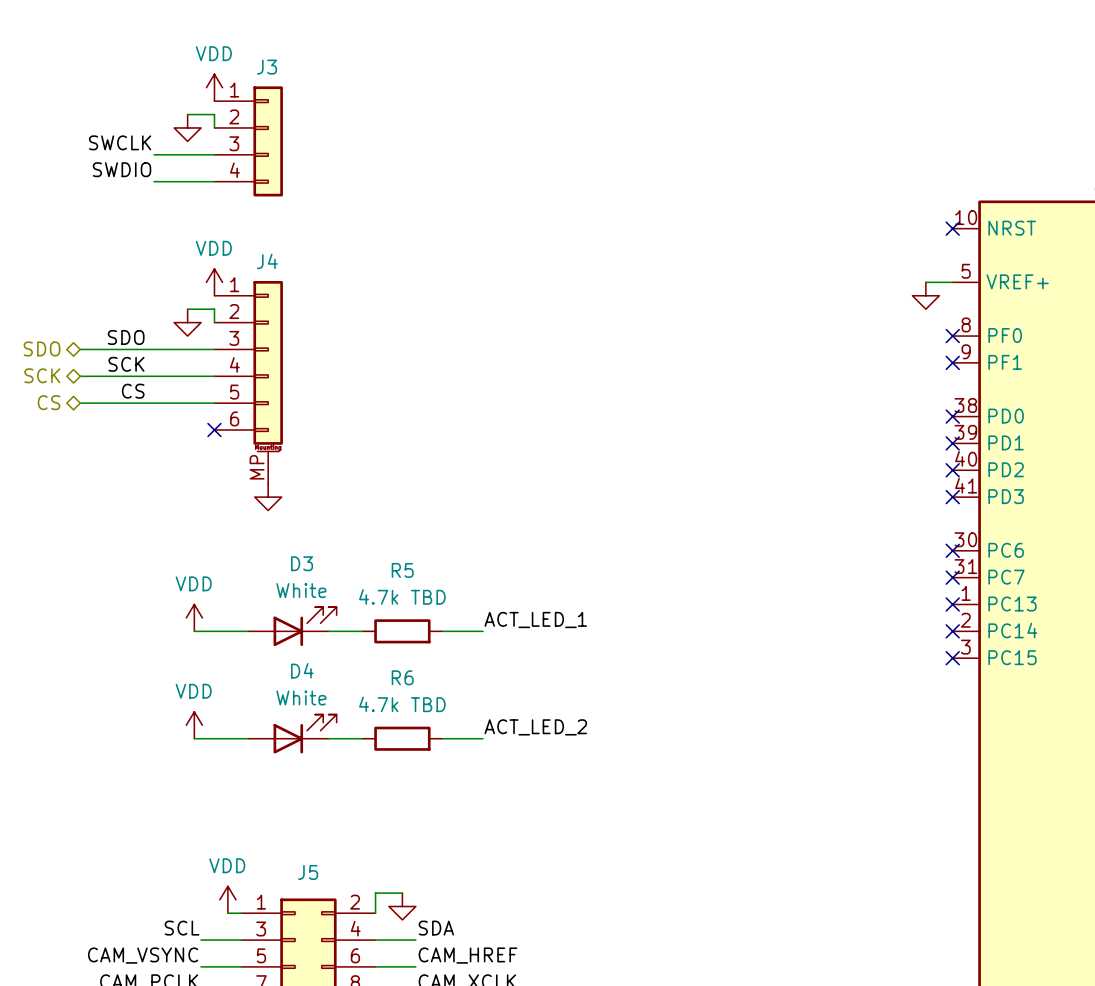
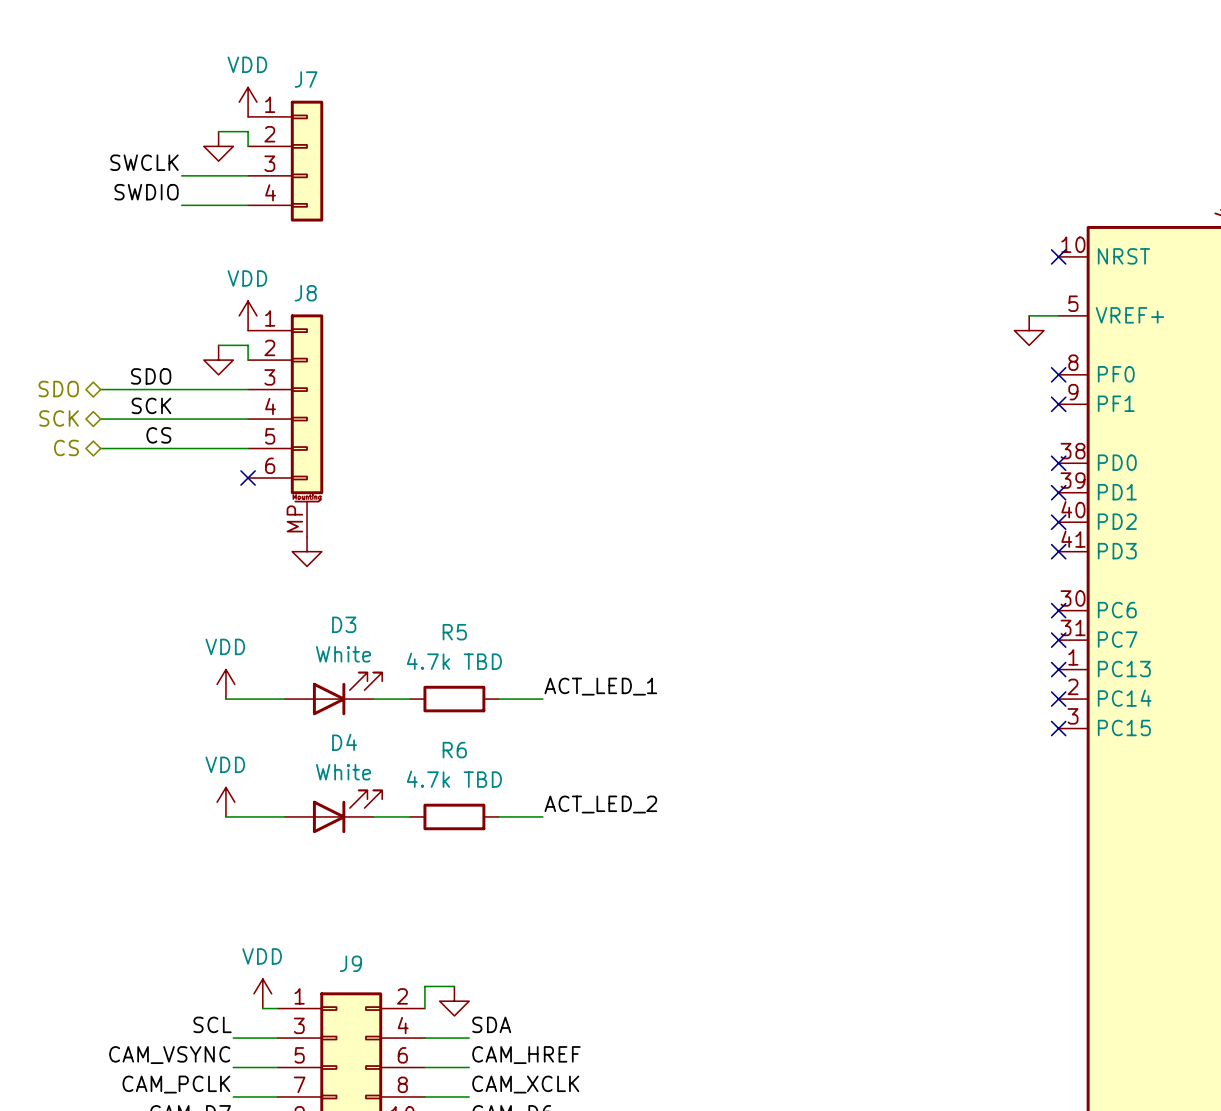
J3 name: J3 (266, 67) -> J7 (306, 79)
J4 name: J4 (267, 261) -> J8 (305, 293)
J5 name: J5 (308, 872) -> J9 (350, 963)

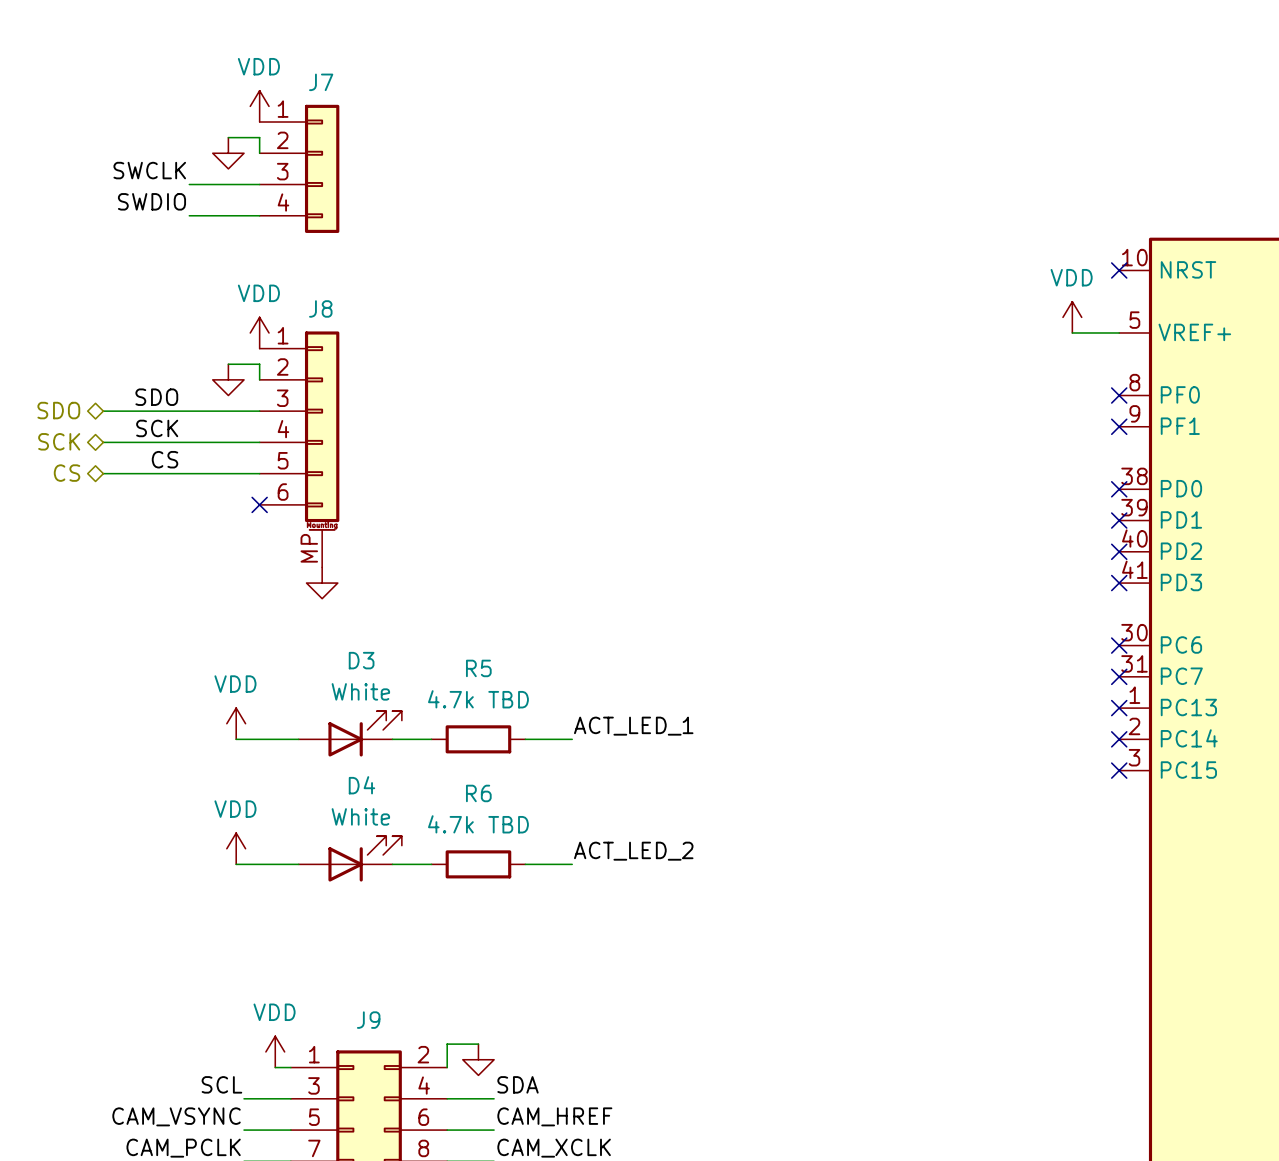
power symbol: none -> VDD (1072, 317)
wire: none -> (1072, 332) (1087, 332)
power symbol: (1029, 330) -> none

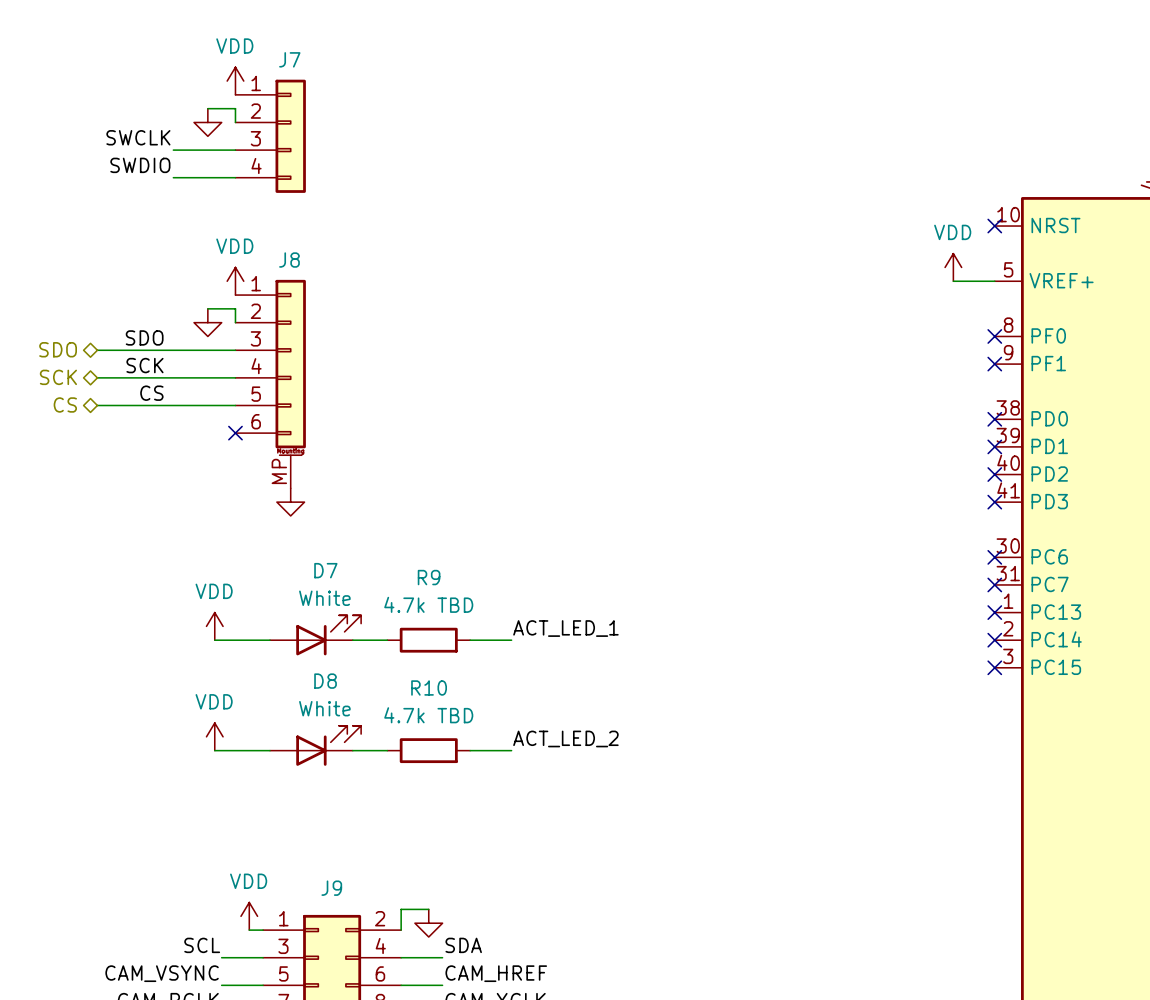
D3 name: D3 (361, 660) -> D7 (325, 570)
R5 name: R5 (478, 668) -> R9 (429, 577)
D4 name: D4 (361, 785) -> D8 (325, 681)
R6 name: R6 (478, 793) -> R10 (429, 687)

